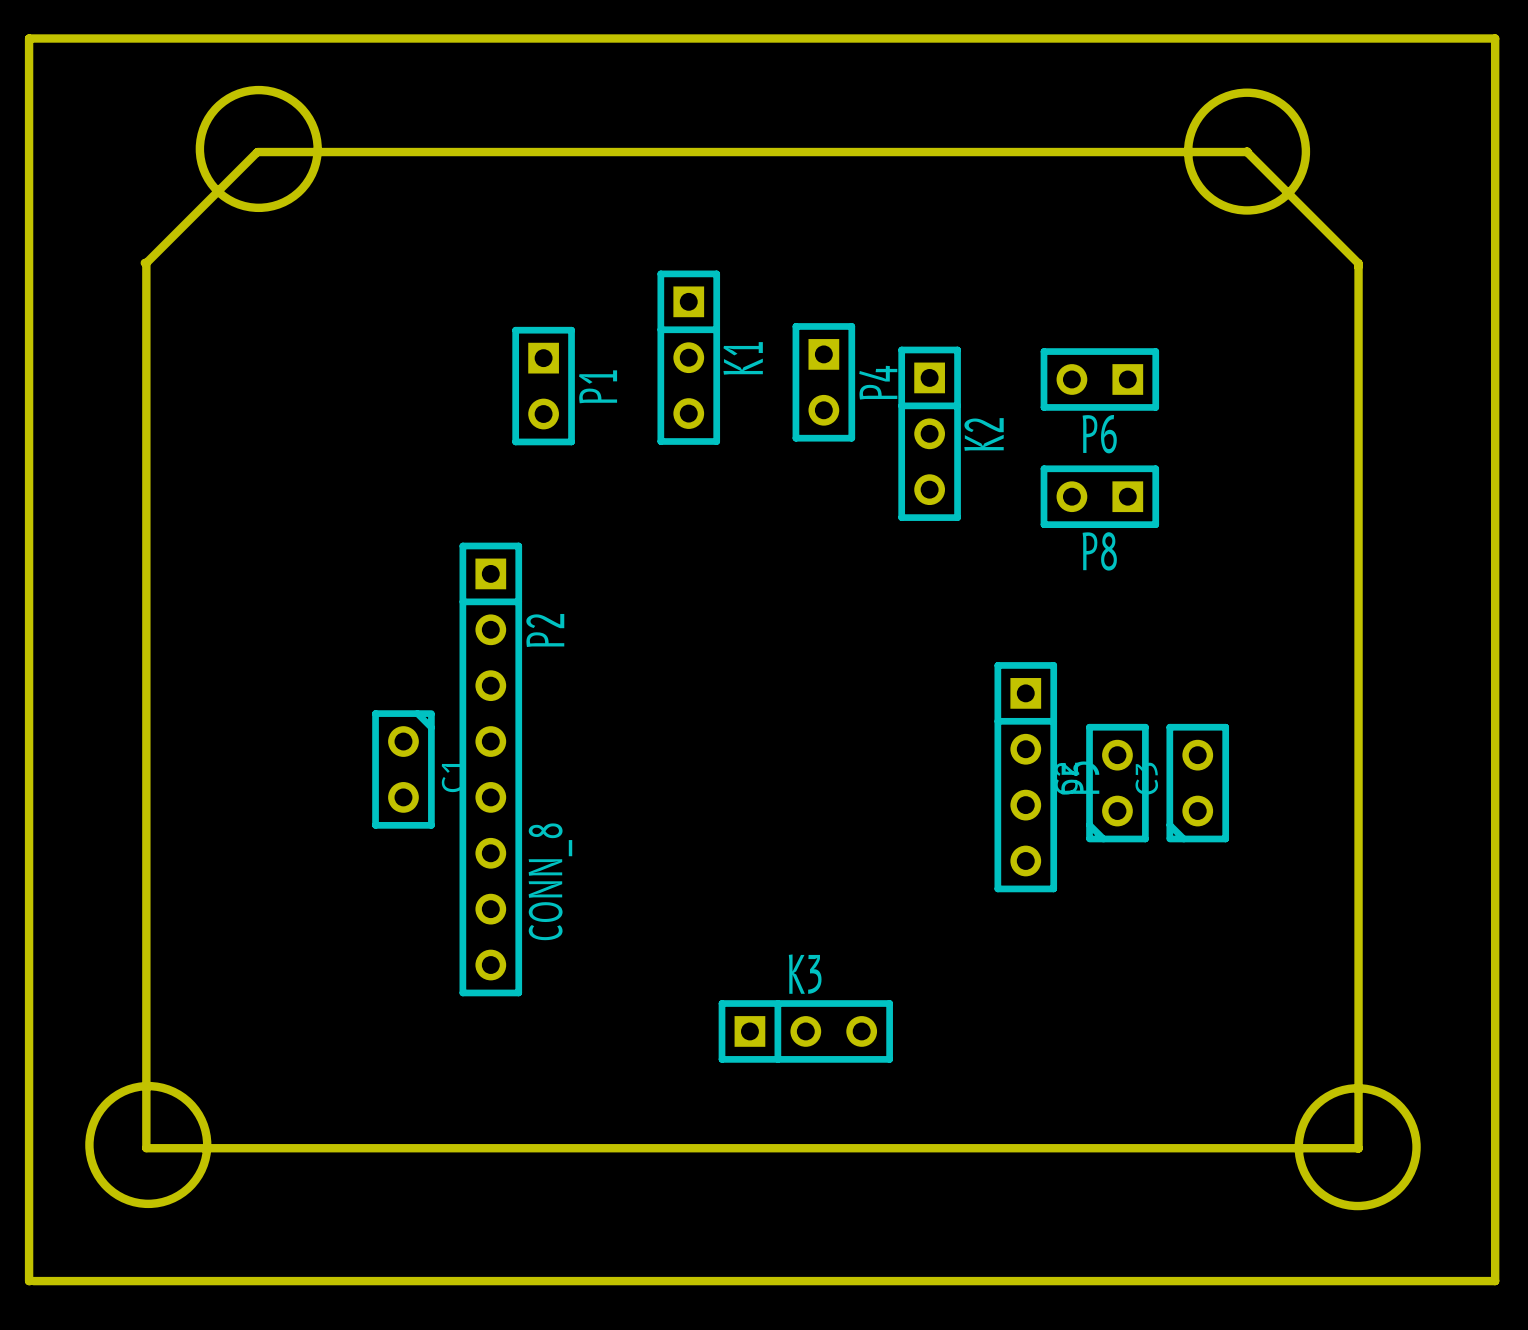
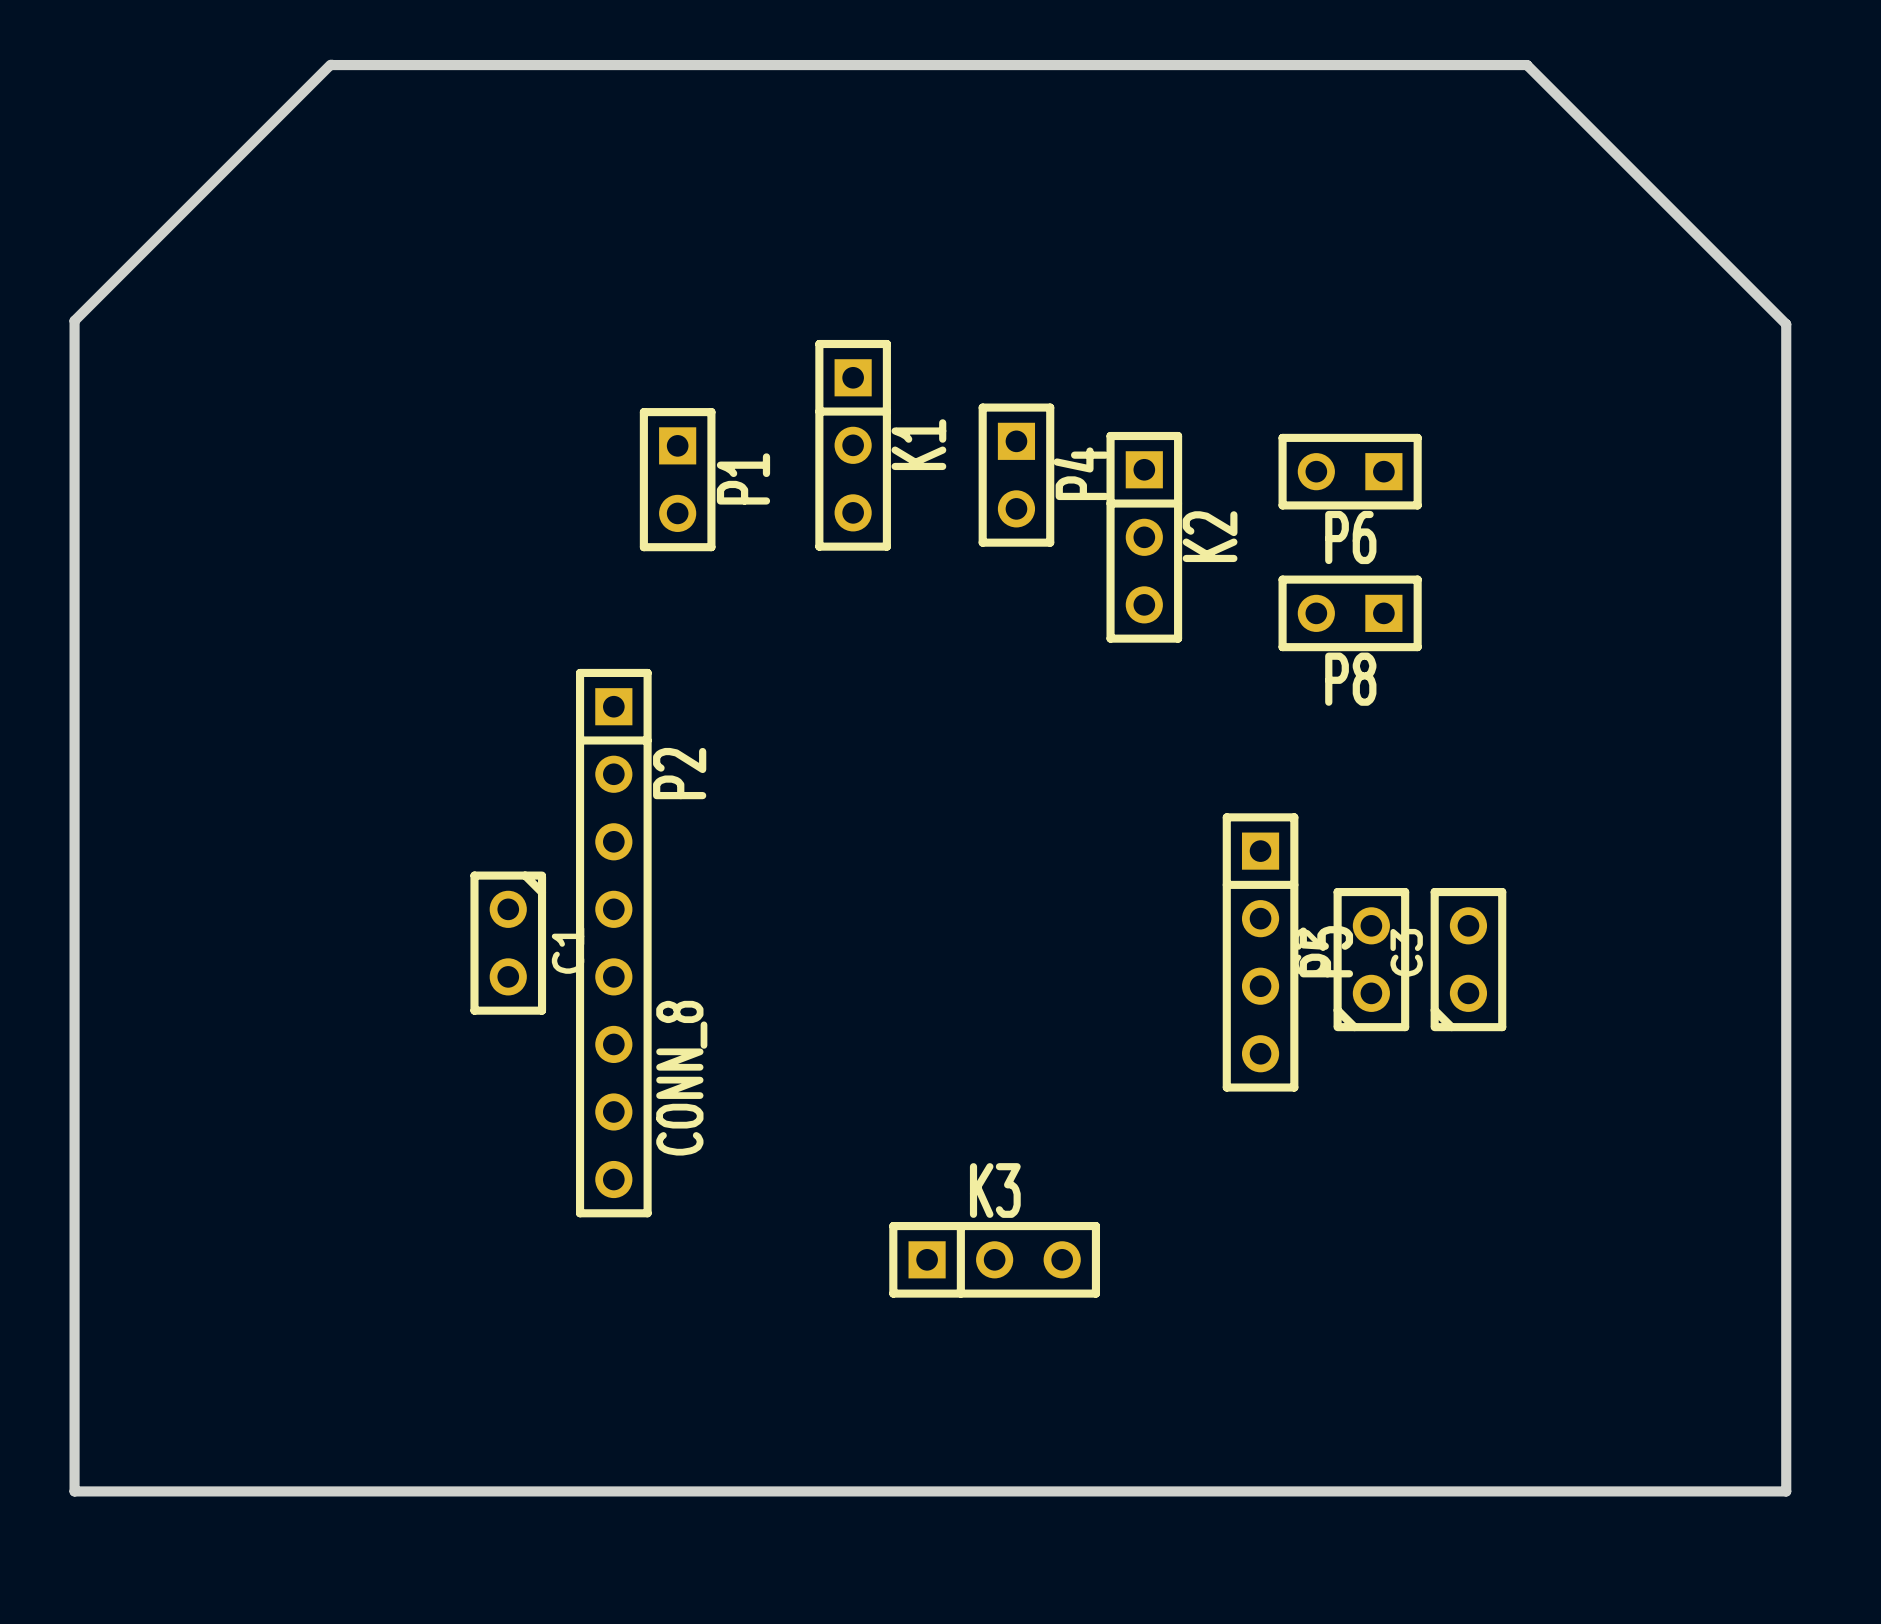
board edge: none -> (330, 64) (74, 320) (74, 1491) (1786, 1491) (1786, 324) (1527, 65) (332, 65)
round board edge: [195, 85, 322, 213] -> none
round board edge: [1183, 88, 1311, 215] -> none
board edge: (1246, 151) (1358, 263) (1358, 266) -> none
board edge: (1247, 151) (257, 152) -> none
board edge: (257, 152) (145, 263) -> none
board edge: (144, 262) (146, 262) (146, 1148) -> none
board edge: (1358, 263) (1357, 1148) -> none
round board edge: [85, 1081, 212, 1209] -> none
round board edge: [1294, 1084, 1421, 1211] -> none
board edge: (146, 1148) (1358, 1148) -> none
board edge: (30, 1281) (29, 38) (1495, 38) (1495, 1281) (33, 1281) -> none

